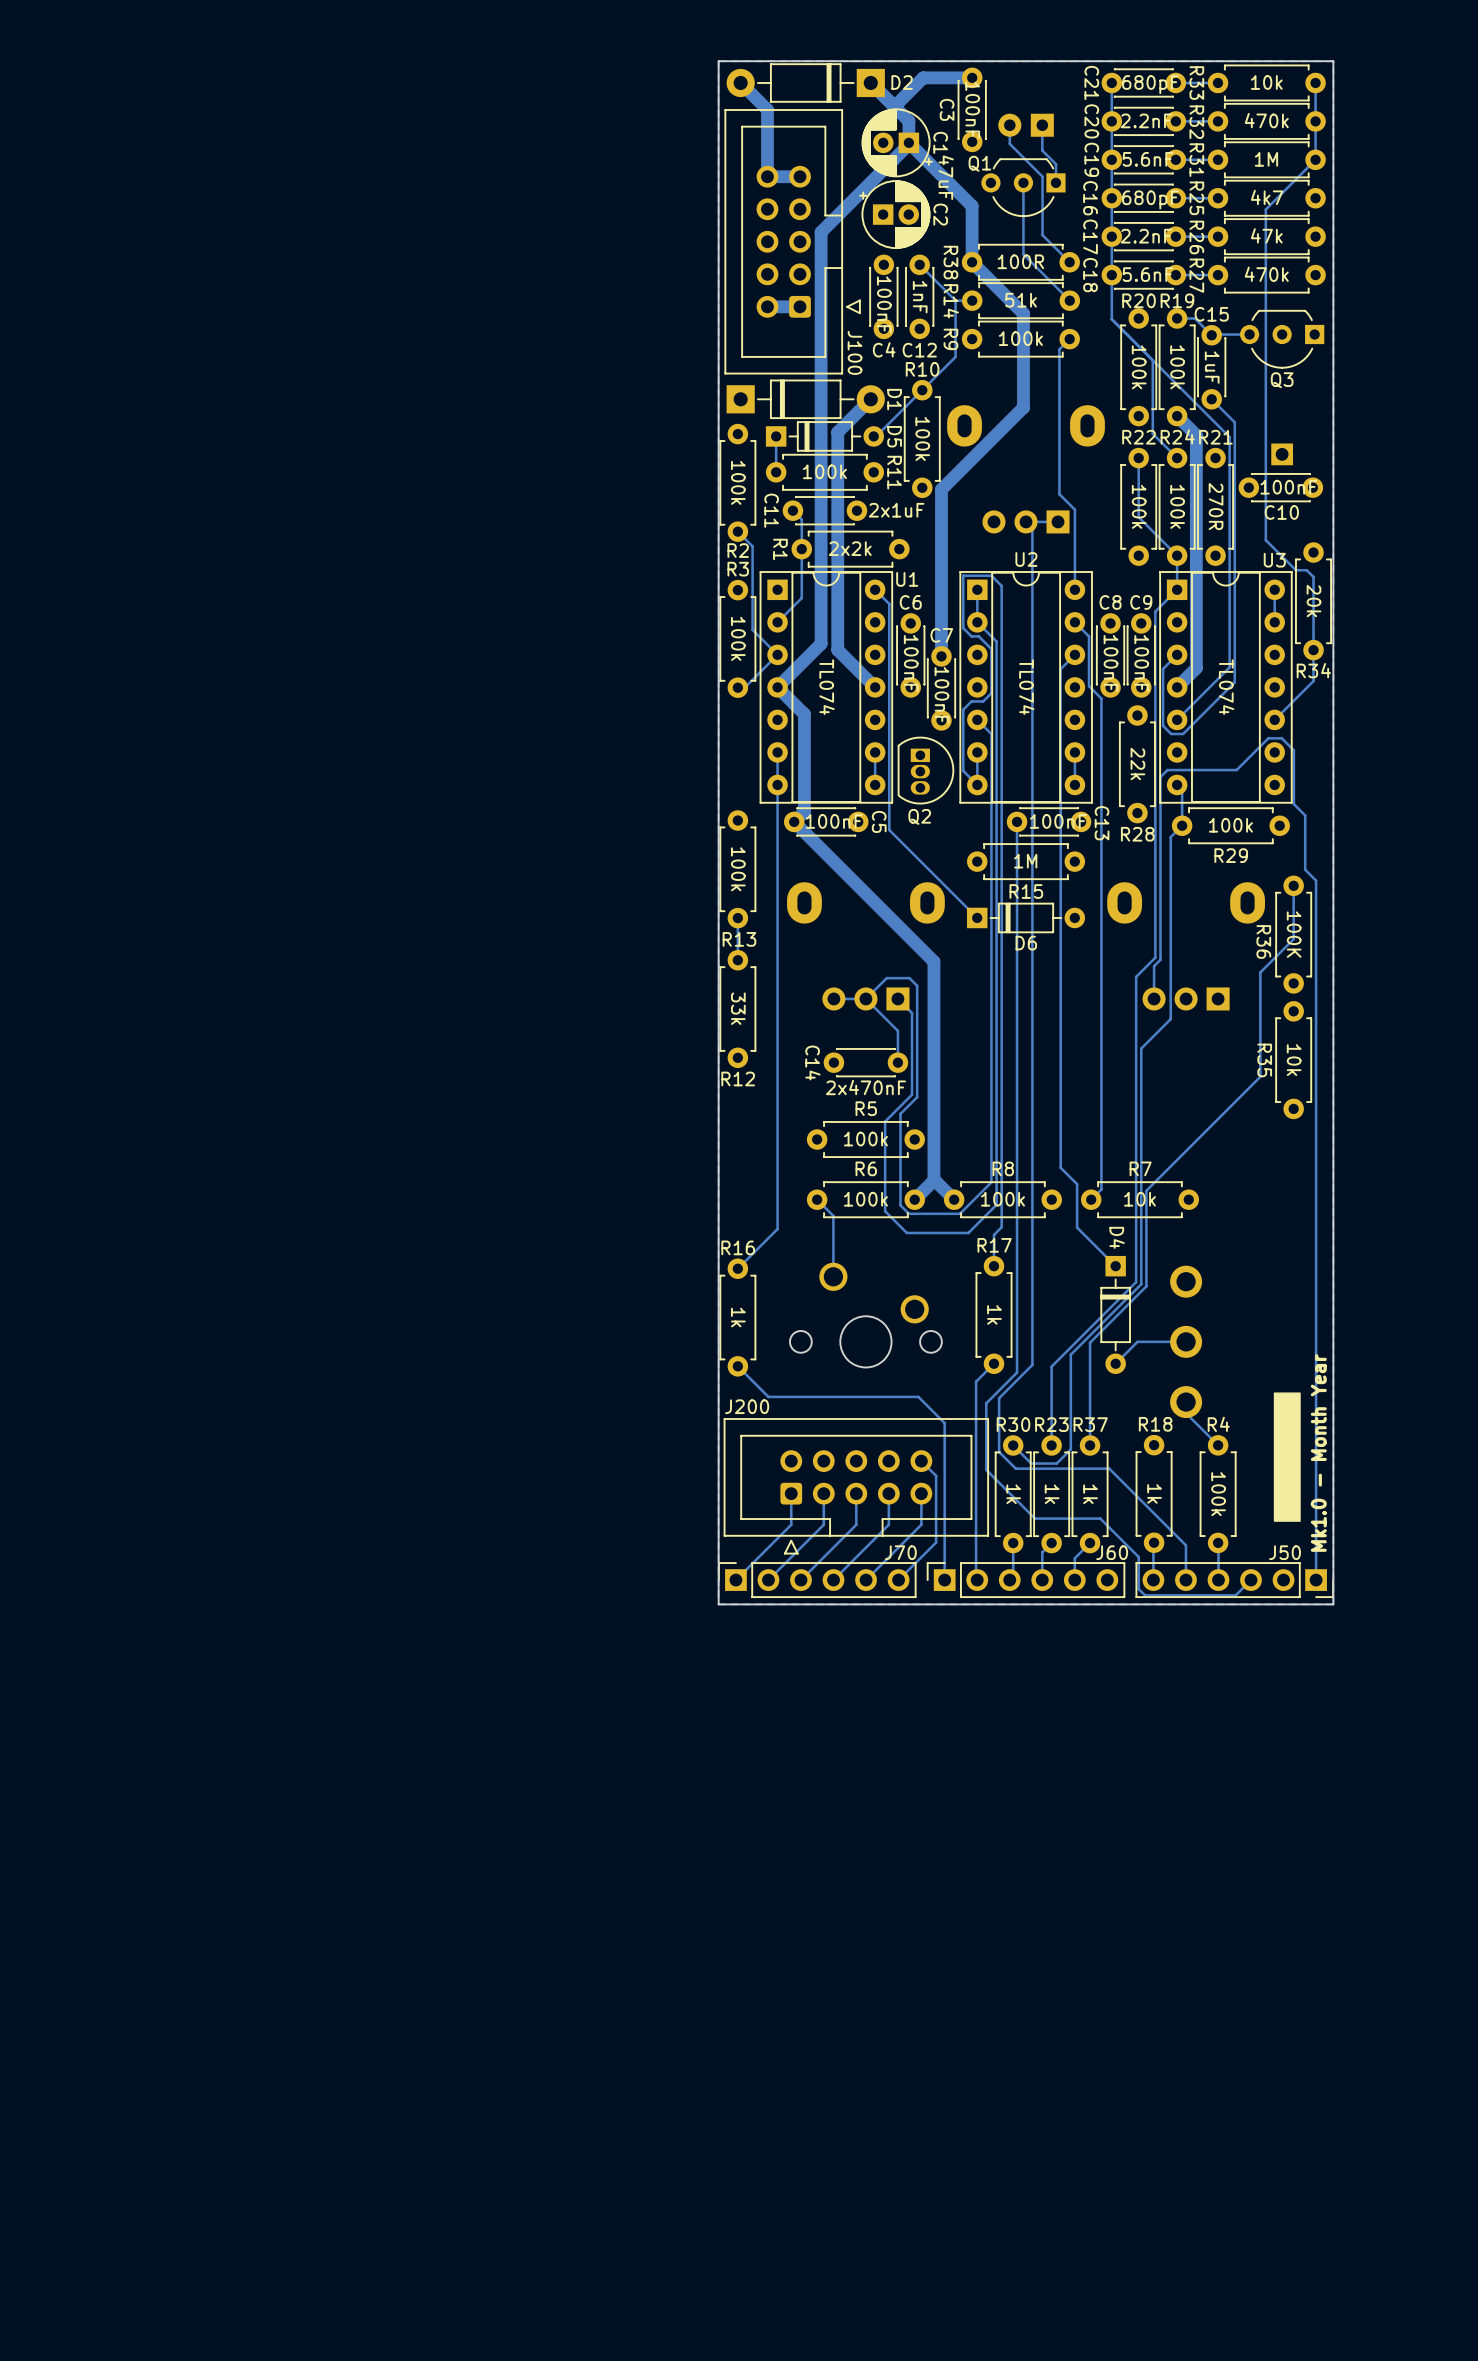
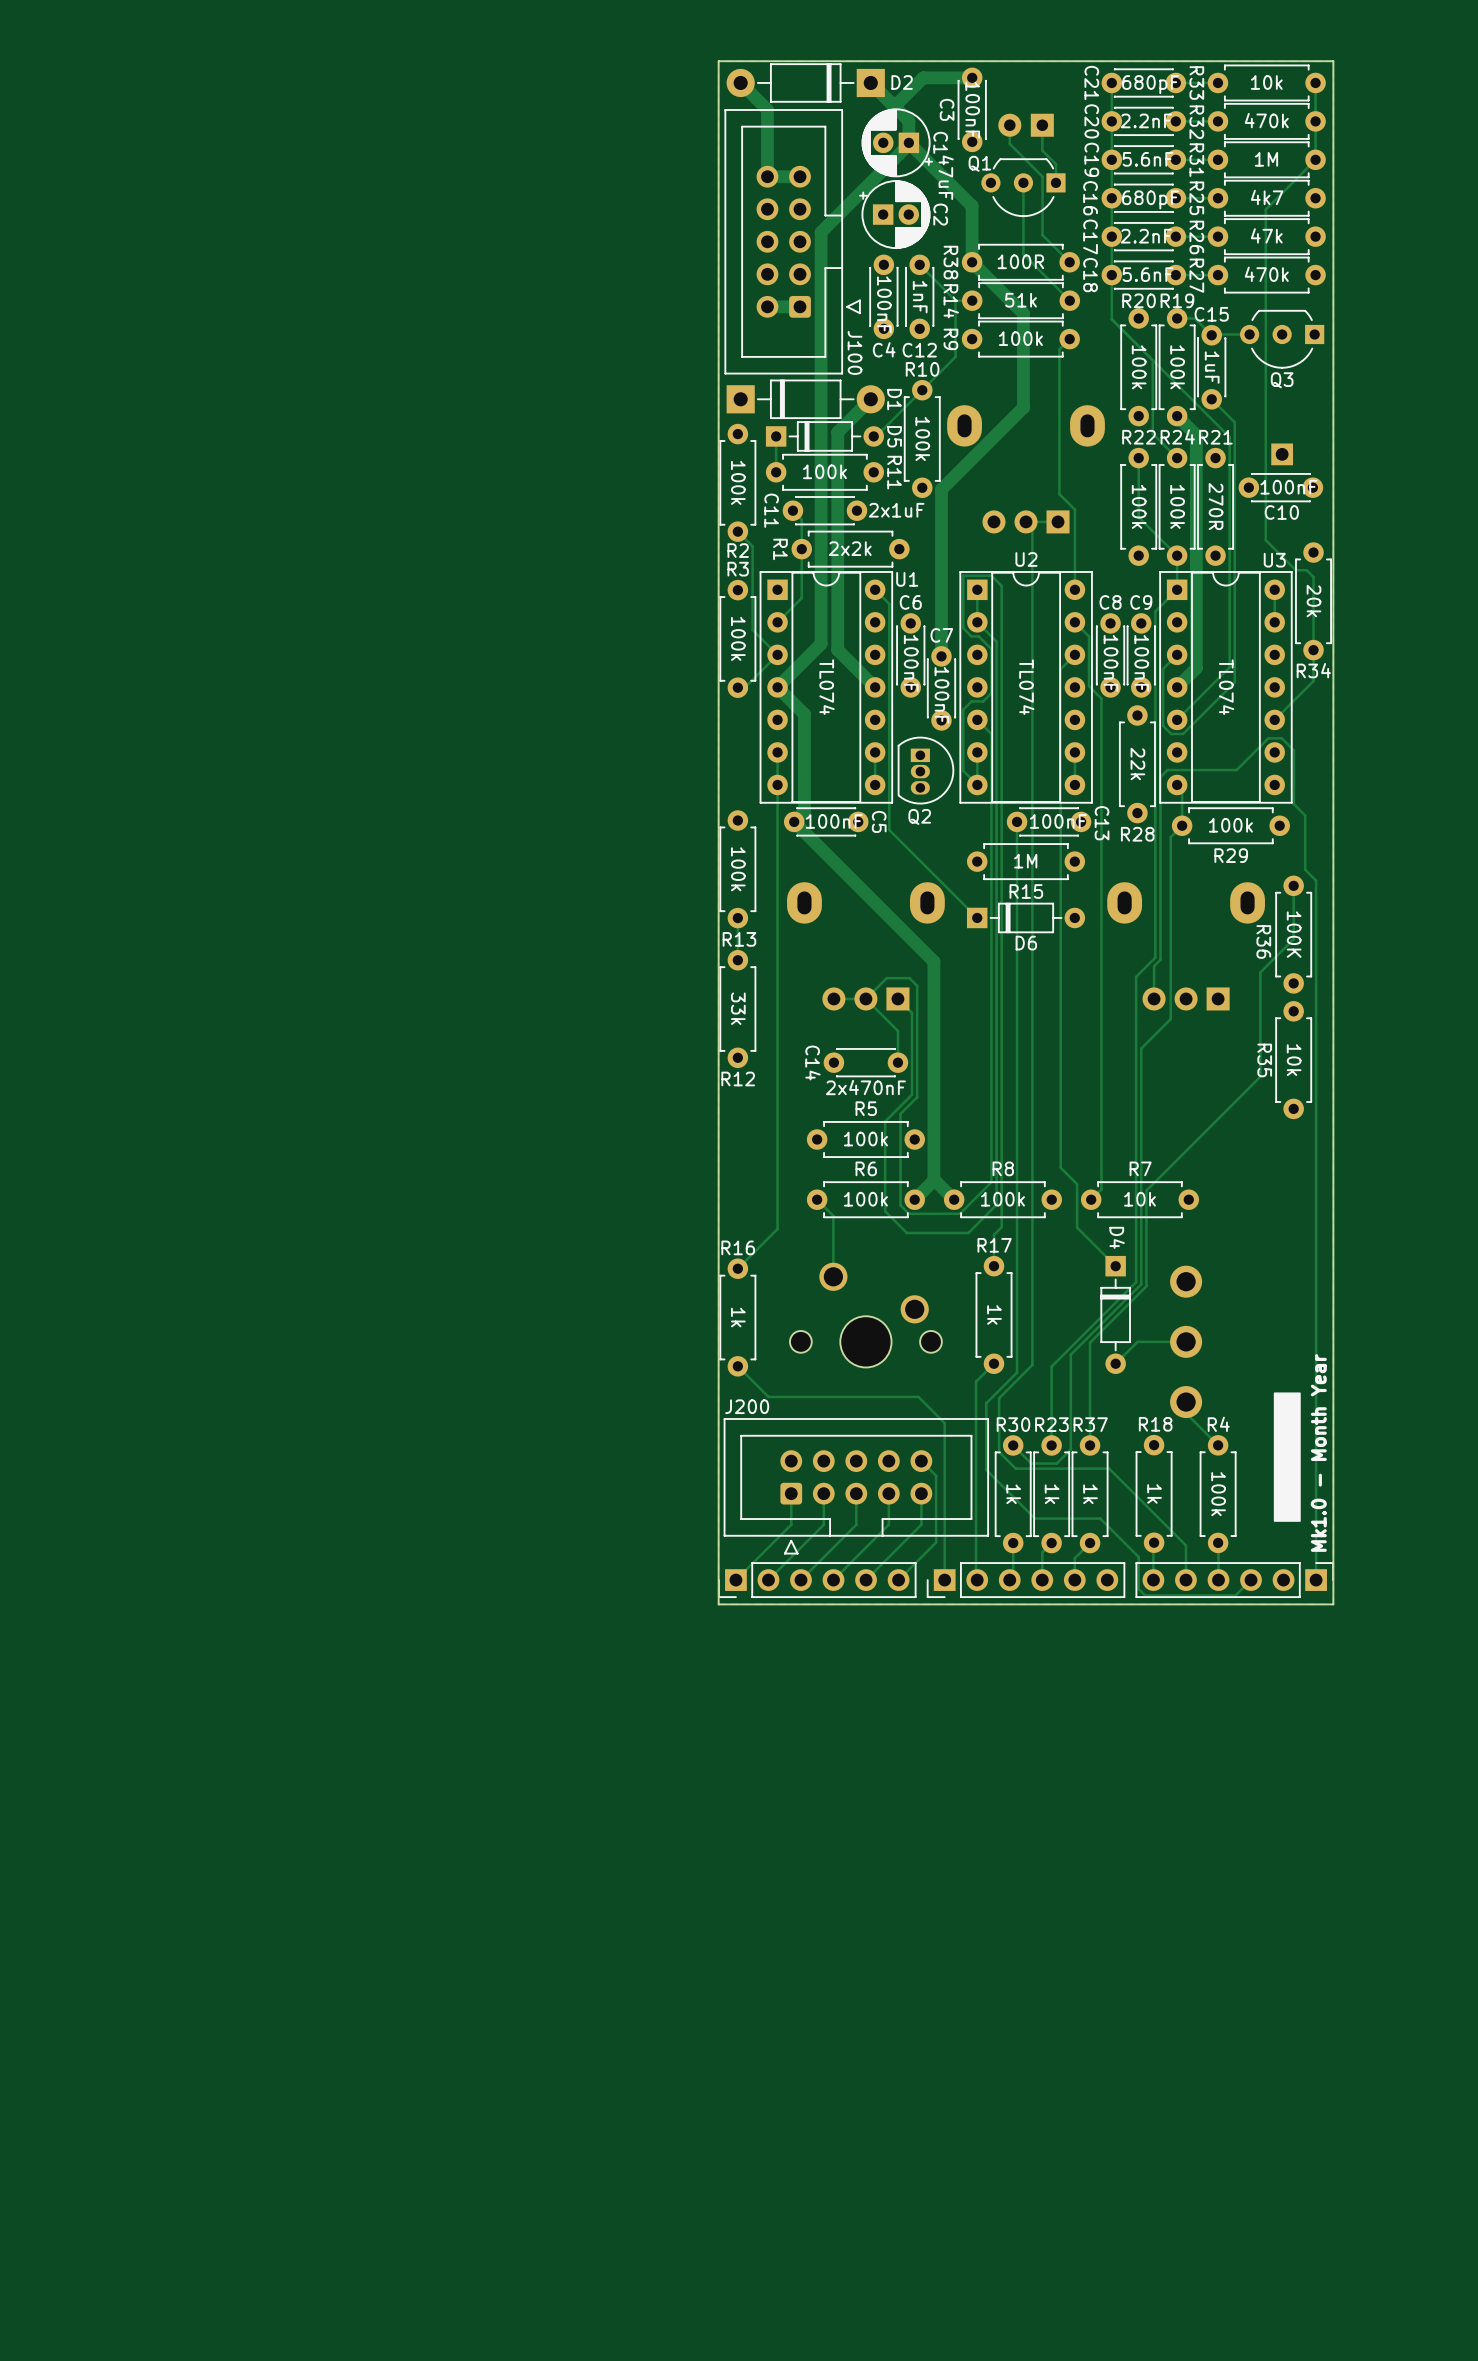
J70: (817, 1580) -> none
part: none -> (817, 1580)
J60: (1026, 1580) -> none
part: none -> (1026, 1580)
J50: (1234, 1580) -> none
part: none -> (1234, 1580)

